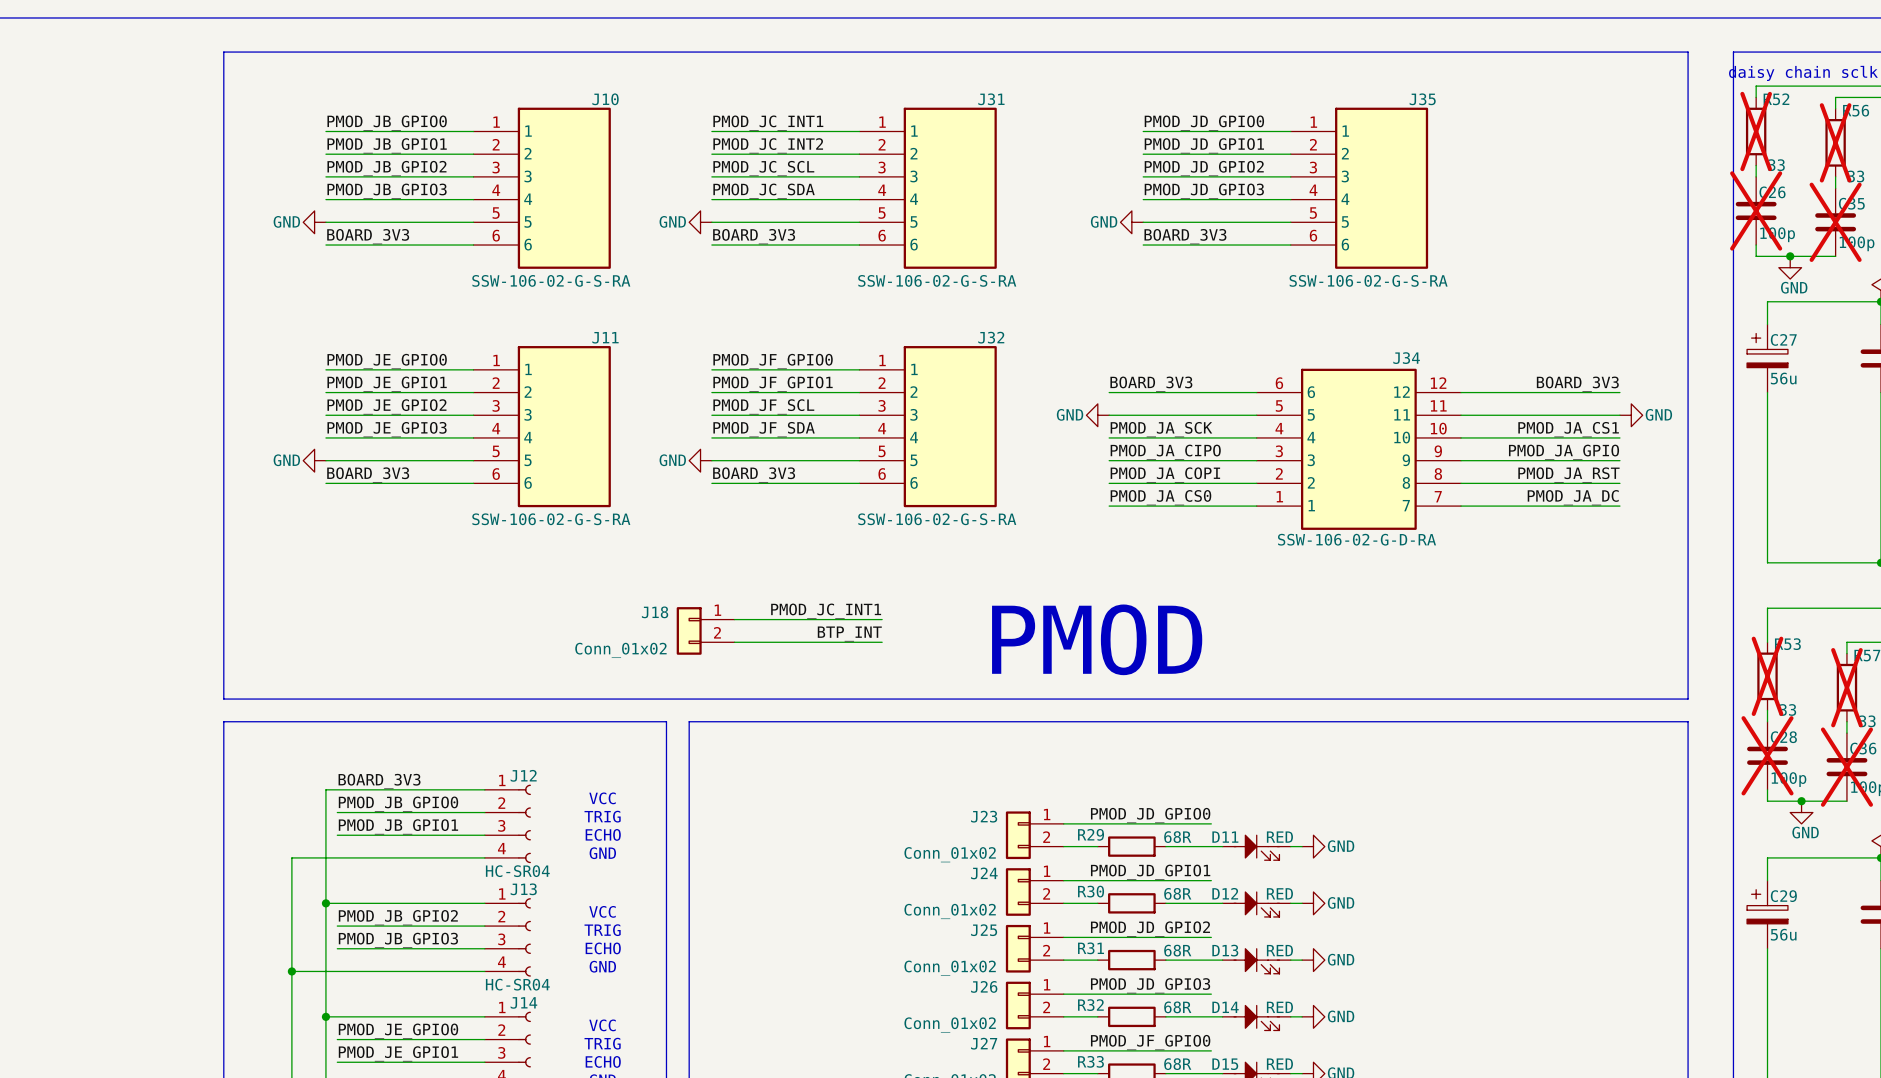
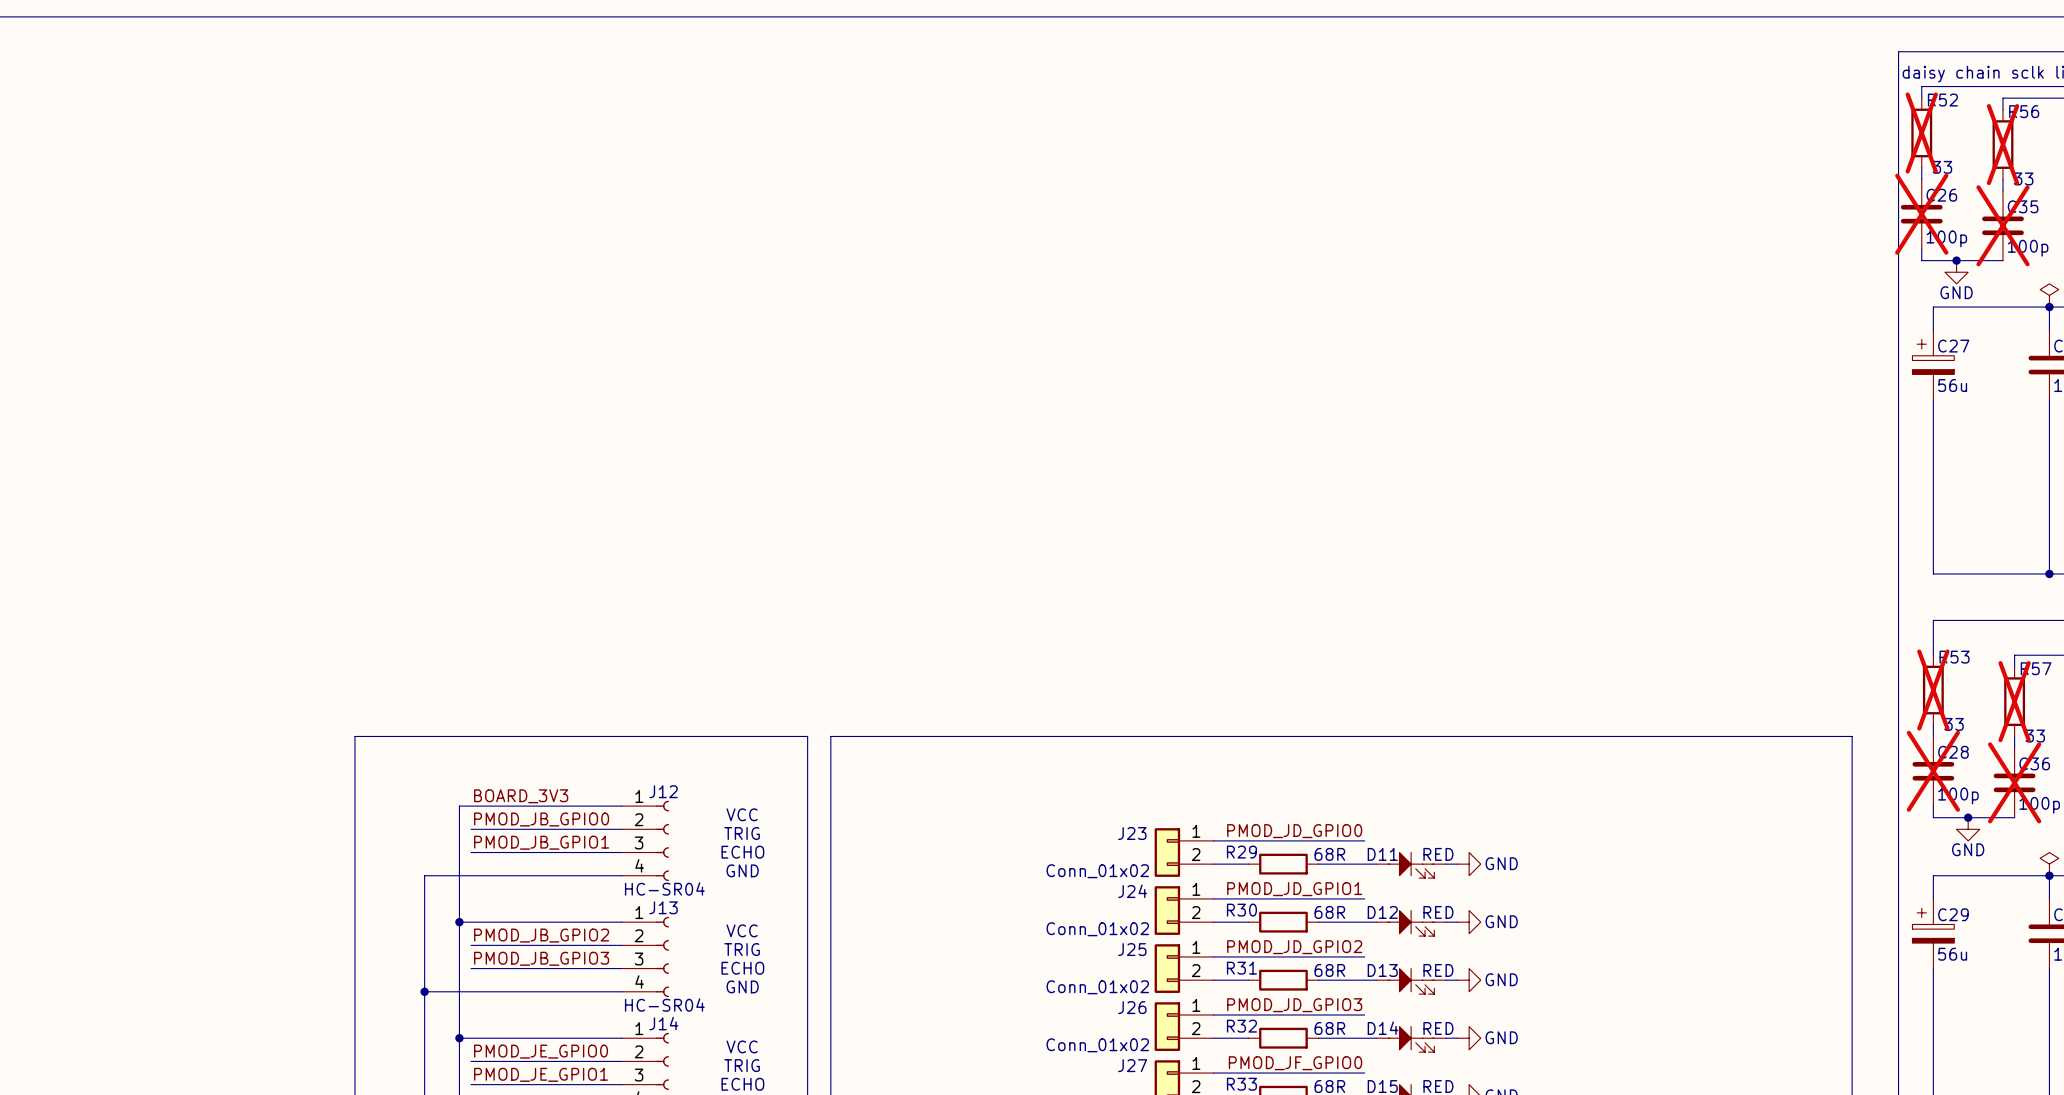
line: (223, 52) (1688, 52) (1688, 699) (223, 699) (223, 52) -> none
label: PMOD_JB_GPIO0 (387, 123) -> none
label: PMOD_JC_INT1 (768, 123) -> none
label: PMOD_JD_GPIO0 (1204, 123) -> none
wire: (325, 131) (473, 131) -> none
wire: (711, 131) (859, 131) -> none
wire: (1143, 131) (1290, 131) -> none
label: PMOD_JB_GPIO1 (387, 145) -> none
label: PMOD_JC_INT2 (768, 145) -> none
label: PMOD_JD_GPIO1 (1204, 145) -> none
wire: (325, 154) (473, 154) -> none
wire: (711, 154) (859, 154) -> none
wire: (1143, 154) (1290, 154) -> none
label: PMOD_JB_GPIO2 (386, 168) -> none
label: PMOD_JC_SCL (763, 168) -> none
label: PMOD_JD_GPIO2 (1204, 168) -> none
wire: (325, 176) (473, 176) -> none
wire: (711, 176) (859, 176) -> none
wire: (1143, 176) (1290, 176) -> none
J10: SSW-106-02-G-S-RA (542, 188) -> none
J31: SSW-106-02-G-S-RA (928, 188) -> none
J35: SSW-106-02-G-S-RA (1359, 188) -> none
label: PMOD_JB_GPIO3 (387, 191) -> none
label: PMOD_JC_SDA (764, 191) -> none
label: PMOD_JD_GPIO3 (1204, 191) -> none
wire: (325, 199) (473, 199) -> none
wire: (711, 199) (859, 199) -> none
wire: (1143, 199) (1290, 199) -> none
power symbol: GND (314, 222) -> none
wire: (325, 222) (473, 222) -> none
power symbol: GND (700, 222) -> none
wire: (711, 222) (859, 222) -> none
power symbol: GND (1131, 222) -> none
wire: (1143, 222) (1290, 222) -> none
label: BOARD_3V3 (368, 236) -> none
label: BOARD_3V3 (754, 236) -> none
label: BOARD_3V3 (1185, 236) -> none
wire: (325, 245) (473, 245) -> none
wire: (711, 245) (859, 245) -> none
wire: (1143, 245) (1290, 245) -> none
label: PMOD_JE_GPIO0 (387, 361) -> none
label: PMOD_JF_GPIO0 (773, 361) -> none
wire: (325, 369) (473, 369) -> none
wire: (711, 369) (859, 369) -> none
label: PMOD_JE_GPIO1 (387, 384) -> none
label: PMOD_JF_GPIO1 (773, 384) -> none
label: BOARD_3V3 (1151, 384) -> none
label: BOARD_3V3 (1577, 384) -> none
wire: (325, 392) (473, 392) -> none
wire: (711, 392) (859, 392) -> none
wire: (1109, 392) (1256, 392) -> none
wire: (1461, 392) (1619, 392) -> none
label: PMOD_JE_GPIO2 (386, 406) -> none
label: PMOD_JF_SCL (763, 406) -> none
wire: (325, 415) (473, 415) -> none
wire: (711, 415) (859, 415) -> none
power symbol: GND (1097, 415) -> none
wire: (1109, 415) (1256, 415) -> none
wire: (1461, 415) (1619, 415) -> none
power symbol: GND (1631, 415) -> none
J11: SSW-106-02-G-S-RA (542, 426) -> none
J32: SSW-106-02-G-S-RA (928, 426) -> none
label: PMOD_JE_GPIO3 (387, 429) -> none
label: PMOD_JF_SDA (764, 429) -> none
label: PMOD_JA_SCK (1161, 429) -> none
label: PMOD_JA_CS1 (1568, 429) -> none
wire: (325, 437) (473, 437) -> none
wire: (711, 437) (859, 437) -> none
wire: (1109, 437) (1256, 437) -> none
wire: (1461, 437) (1619, 437) -> none
J34: SSW-106-02-G-D-RA (1358, 449) -> none
label: PMOD_JA_CIPO (1165, 452) -> none
label: PMOD_JA_GPIO (1564, 452) -> none
power symbol: GND (314, 460) -> none
wire: (325, 460) (473, 460) -> none
power symbol: GND (700, 460) -> none
wire: (711, 460) (859, 460) -> none
wire: (1109, 460) (1256, 460) -> none
wire: (1461, 460) (1619, 460) -> none
label: BOARD_3V3 (368, 474) -> none
label: BOARD_3V3 (754, 474) -> none
label: PMOD_JA_COPI (1165, 474) -> none
label: PMOD_JA_RST (1568, 474) -> none
wire: (325, 483) (473, 483) -> none
wire: (711, 483) (859, 483) -> none
wire: (1109, 483) (1256, 483) -> none
wire: (1461, 483) (1619, 483) -> none
label: PMOD_JA_CS0 (1160, 497) -> none
label: PMOD_JA_DC (1573, 497) -> none
wire: (1109, 506) (1256, 506) -> none
wire: (1461, 506) (1619, 506) -> none
label: PMOD_JC_INT1 (826, 611) -> none
wire: (734, 619) (882, 619) -> none
J18: Conn_01x02 (705, 630) -> none
label: BTP_INT (849, 633) -> none
text: PMOD (1097, 639) -> none
wire: (734, 642) (882, 642) -> none

